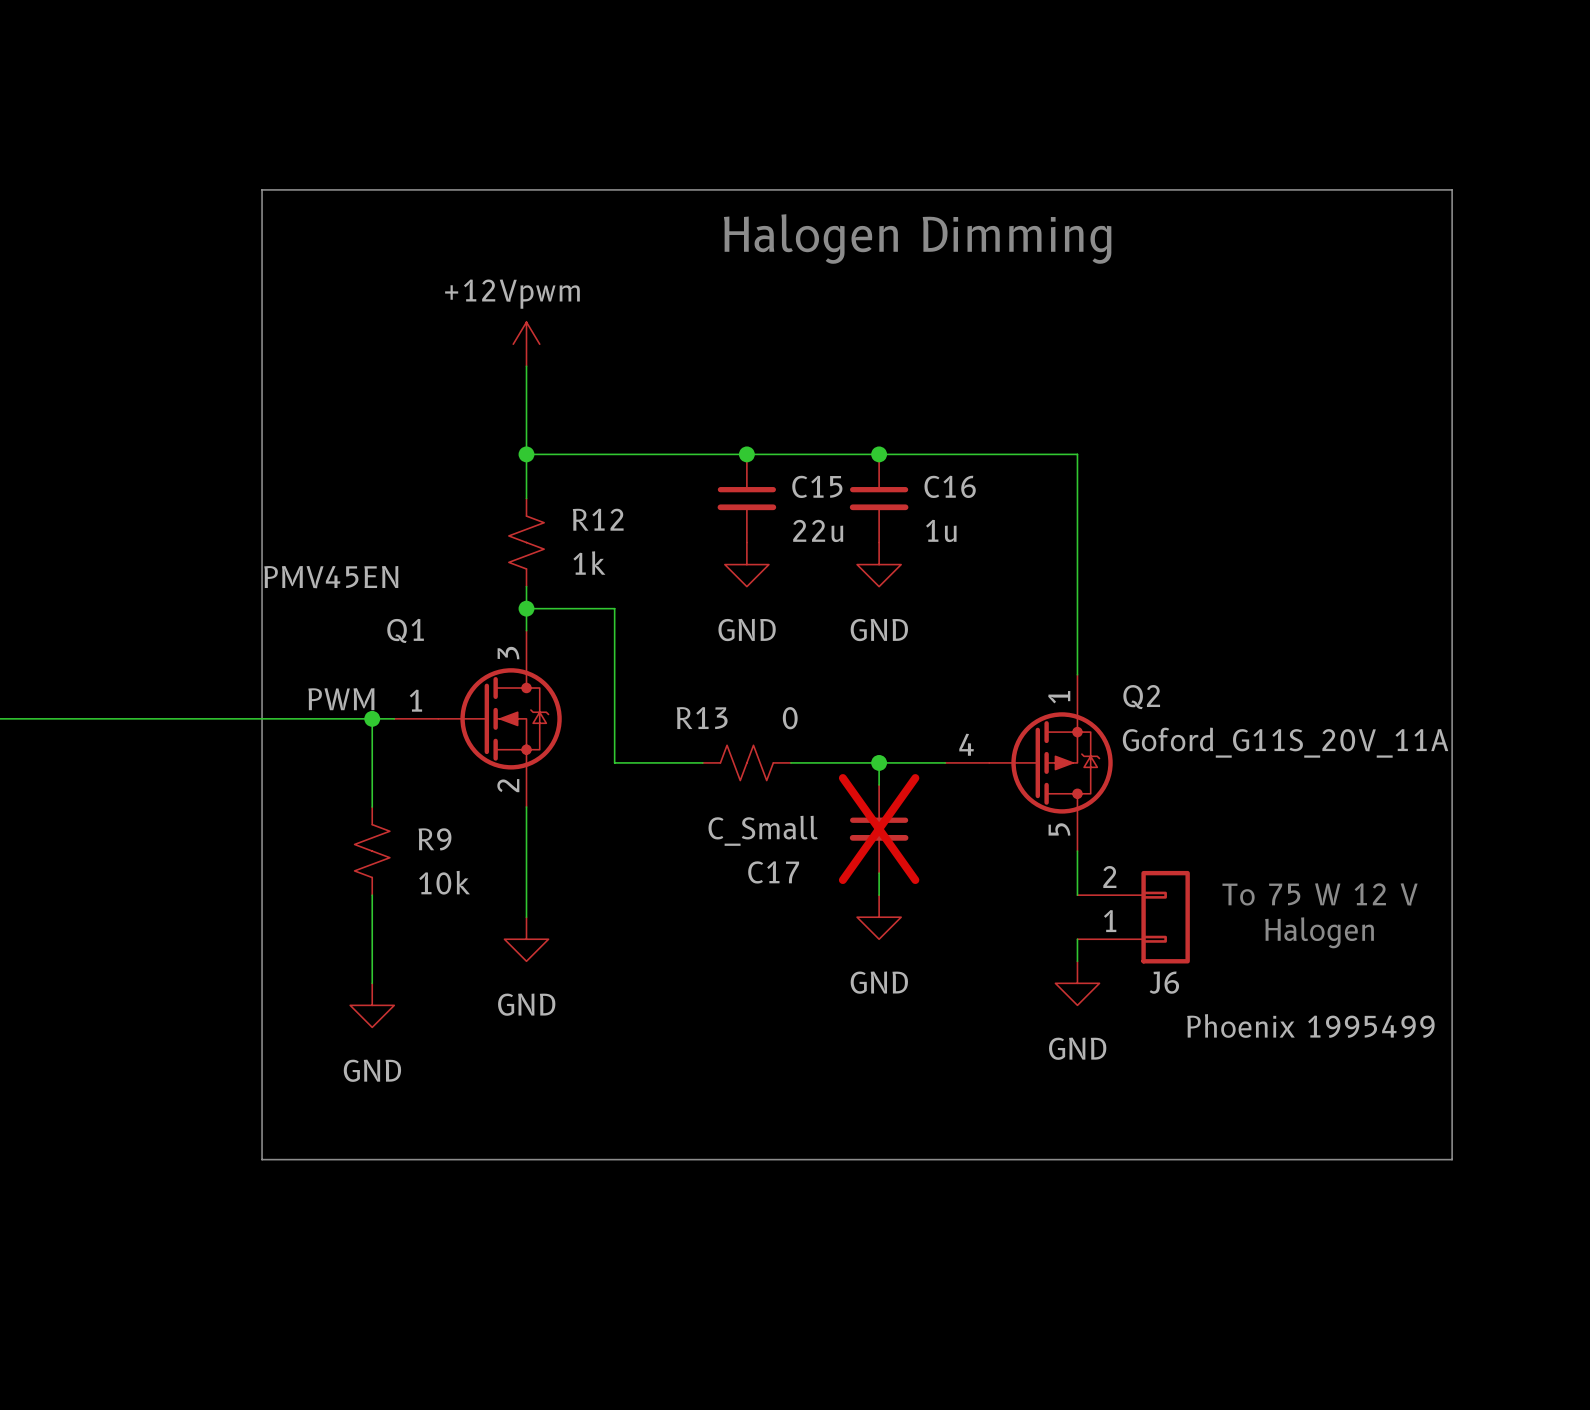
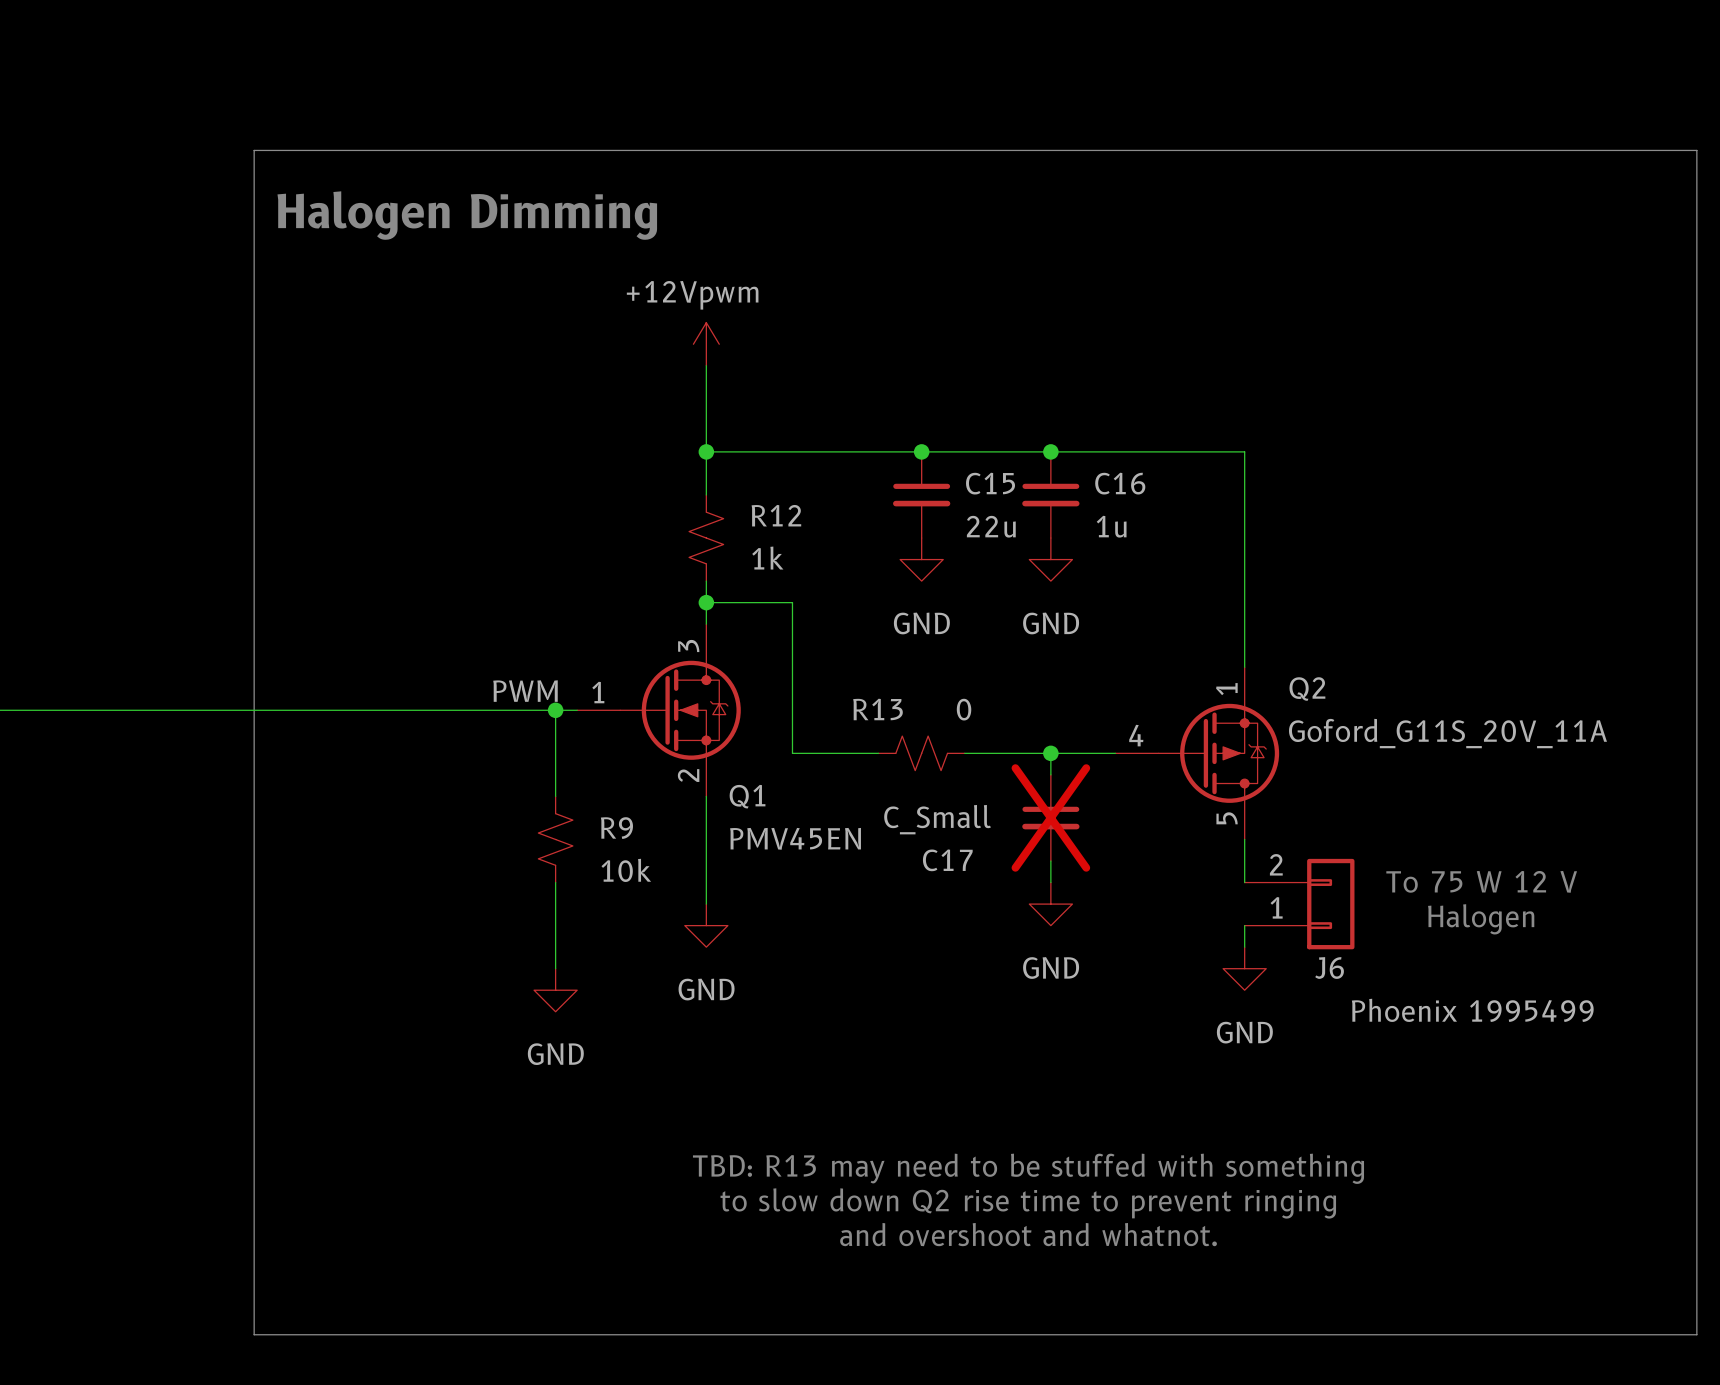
line: (262, 189) (1452, 189) (1452, 1159) (262, 1159) (262, 189) -> (254, 150) (254, 1334) (1696, 1334) (1696, 150) (254, 150)
text: none -> Halogen Dimming (467, 215)
text: Halogen Dimming (917, 239) -> none
Q1 value position: PMV45EN (331, 577) -> PMV45EN (795, 838)
Q1 name position: Q1 (405, 630) -> Q1 (747, 796)
text: none -> TBD: R13 may need to be stuffed with something (1028, 1168)
text: none -> to slow down Q2 rise time to prevent ringing (1028, 1203)
text: none -> and overshoot and whatnot. (1028, 1234)

